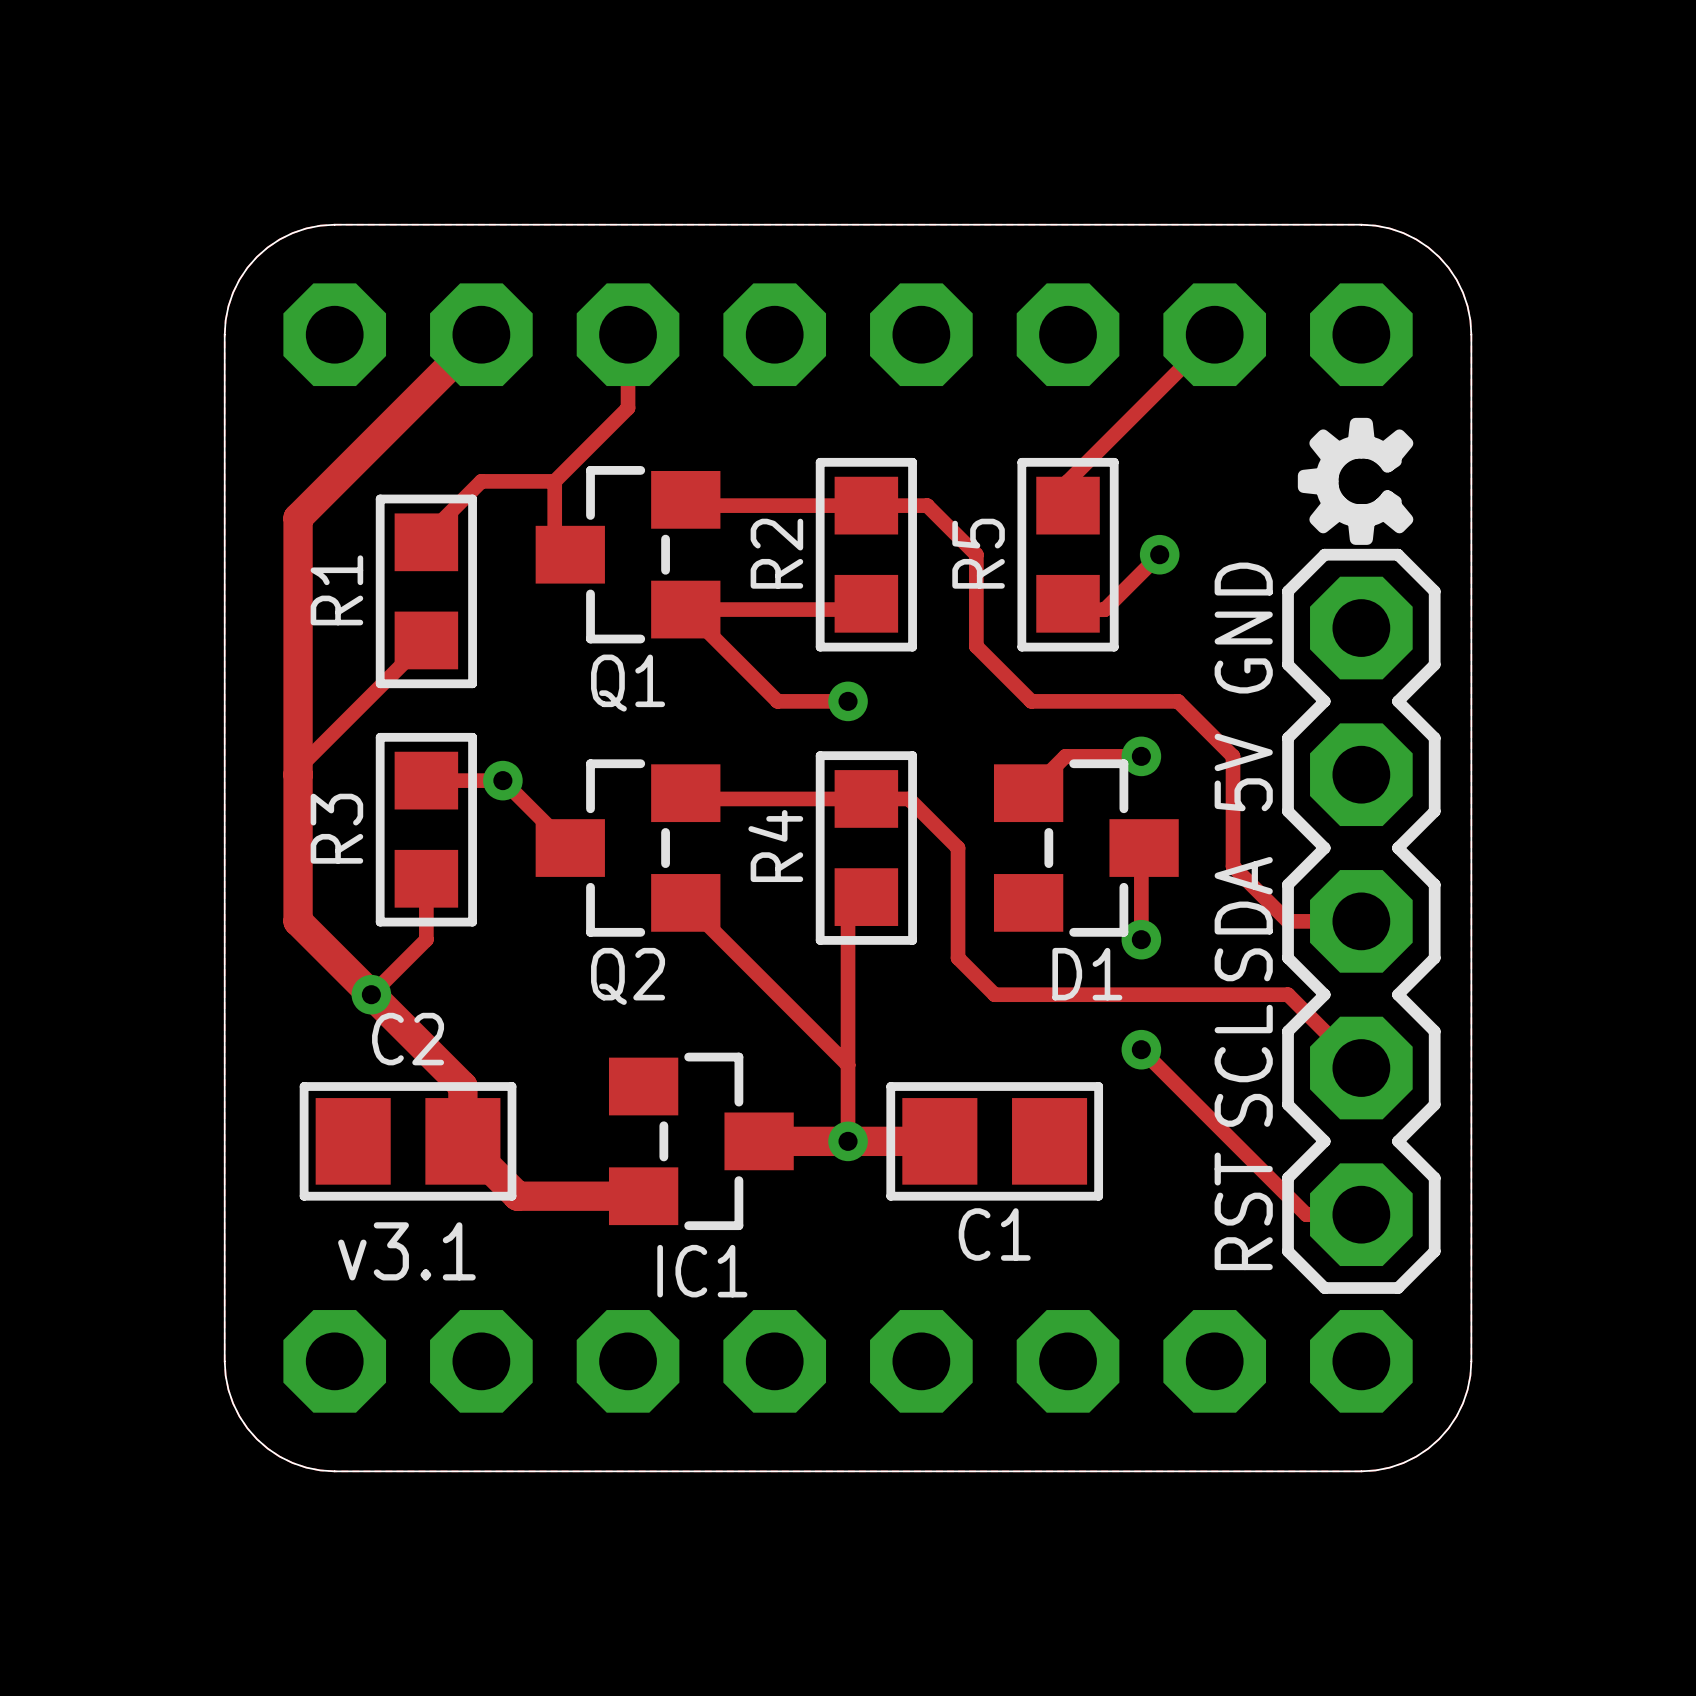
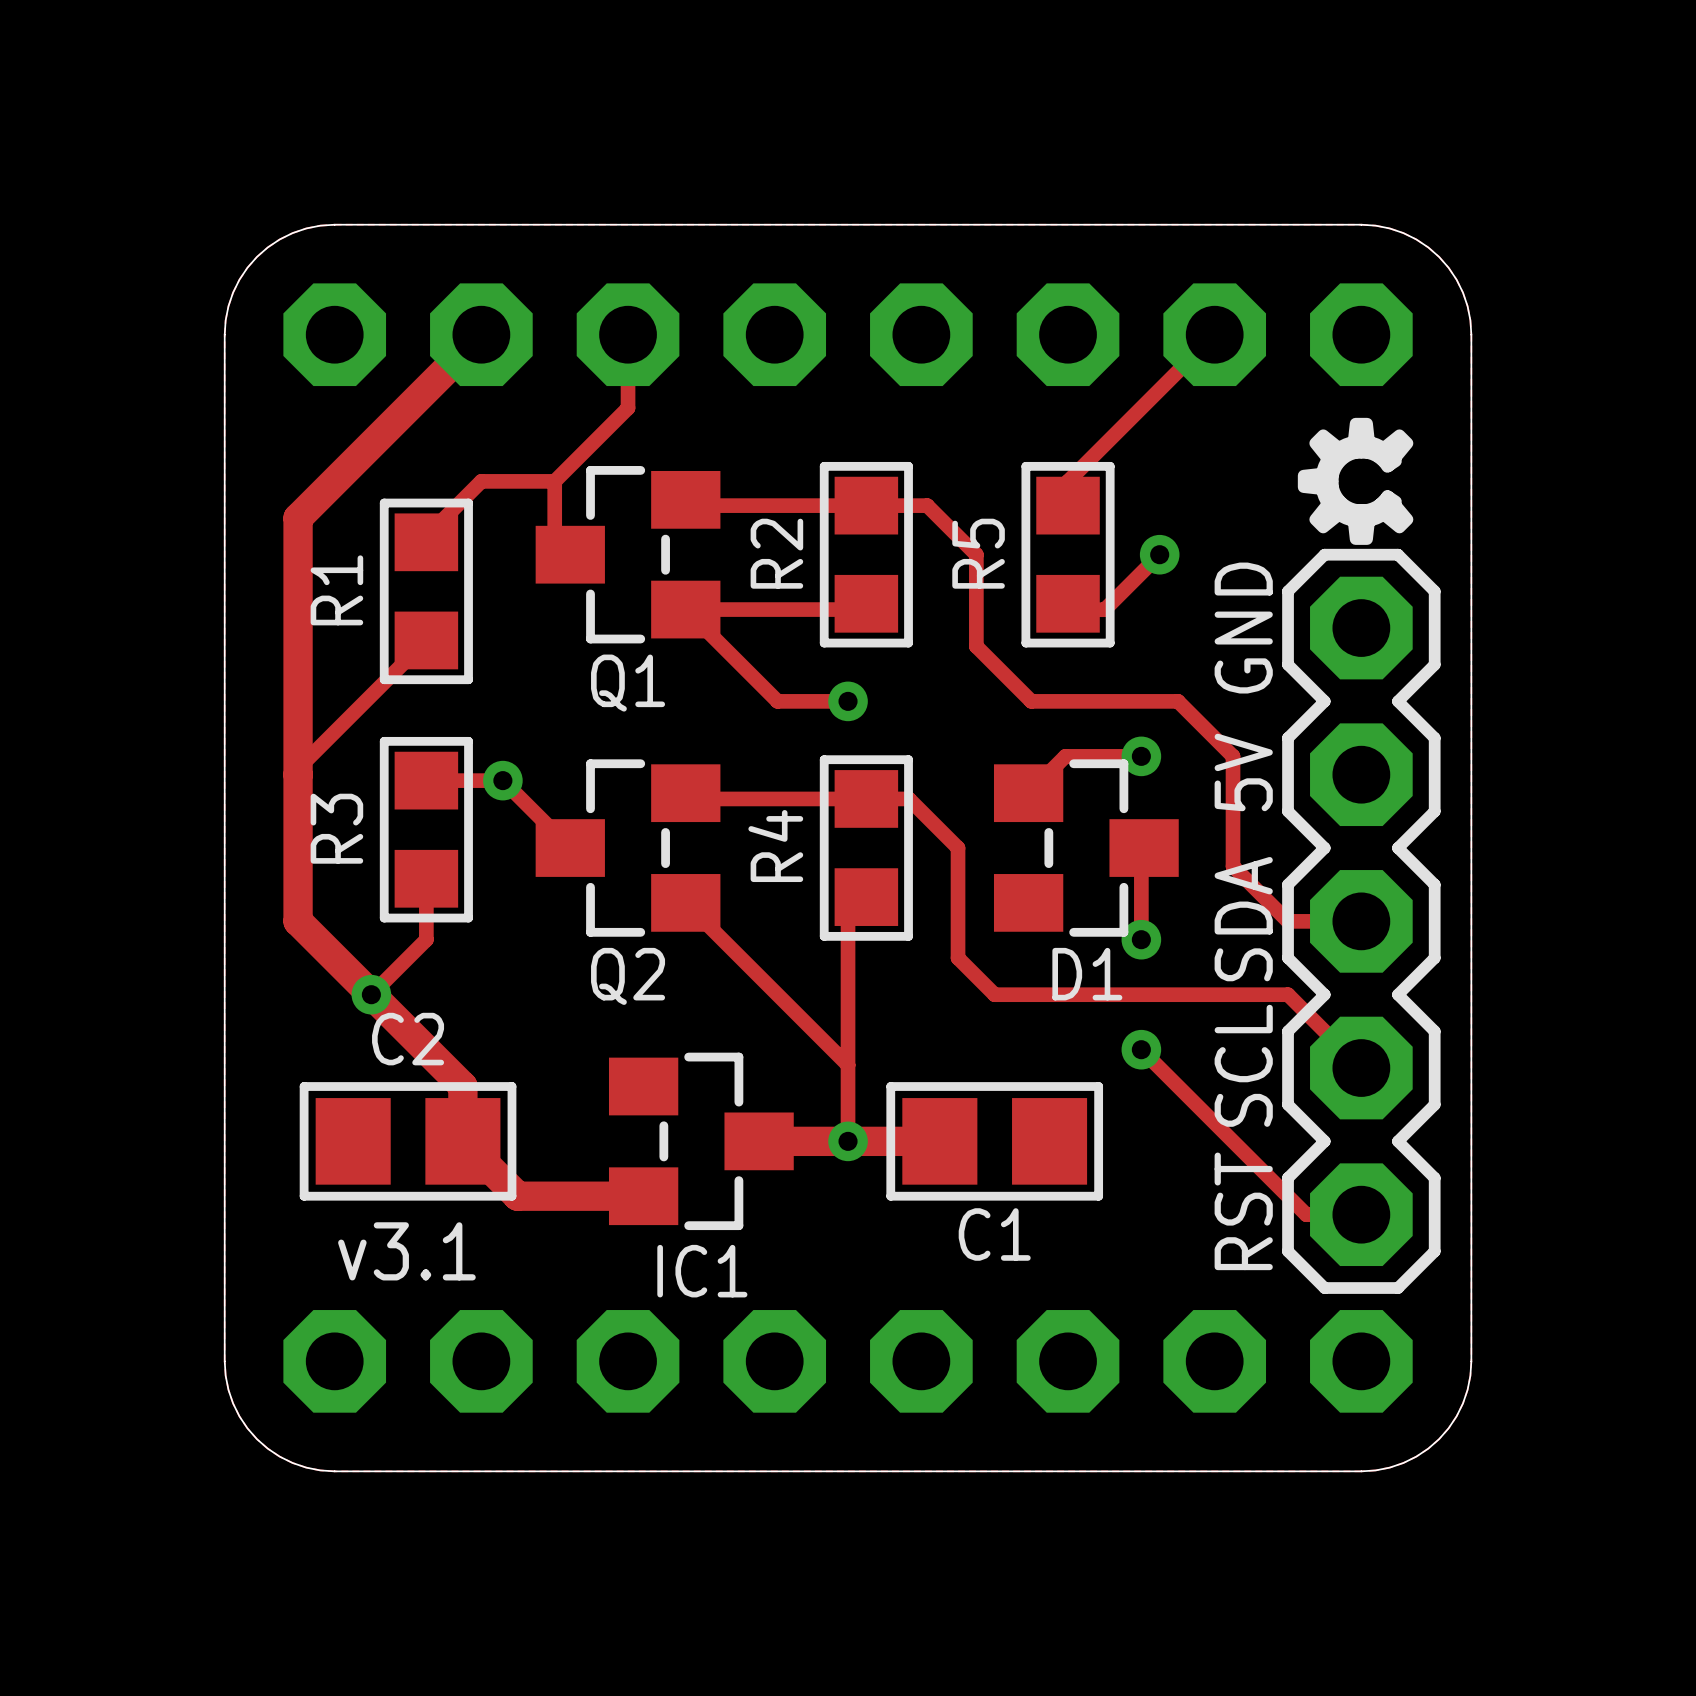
R2 footprint: [815, 457, 917, 652] -> [819, 461, 913, 648]
R5 footprint: [1017, 457, 1119, 652] -> [1021, 461, 1115, 648]
R1 footprint: [375, 494, 477, 689] -> [379, 498, 473, 685]
R3 footprint: [375, 732, 477, 927] -> [379, 736, 473, 923]
R4 footprint: [815, 751, 917, 945] -> [819, 755, 913, 941]

